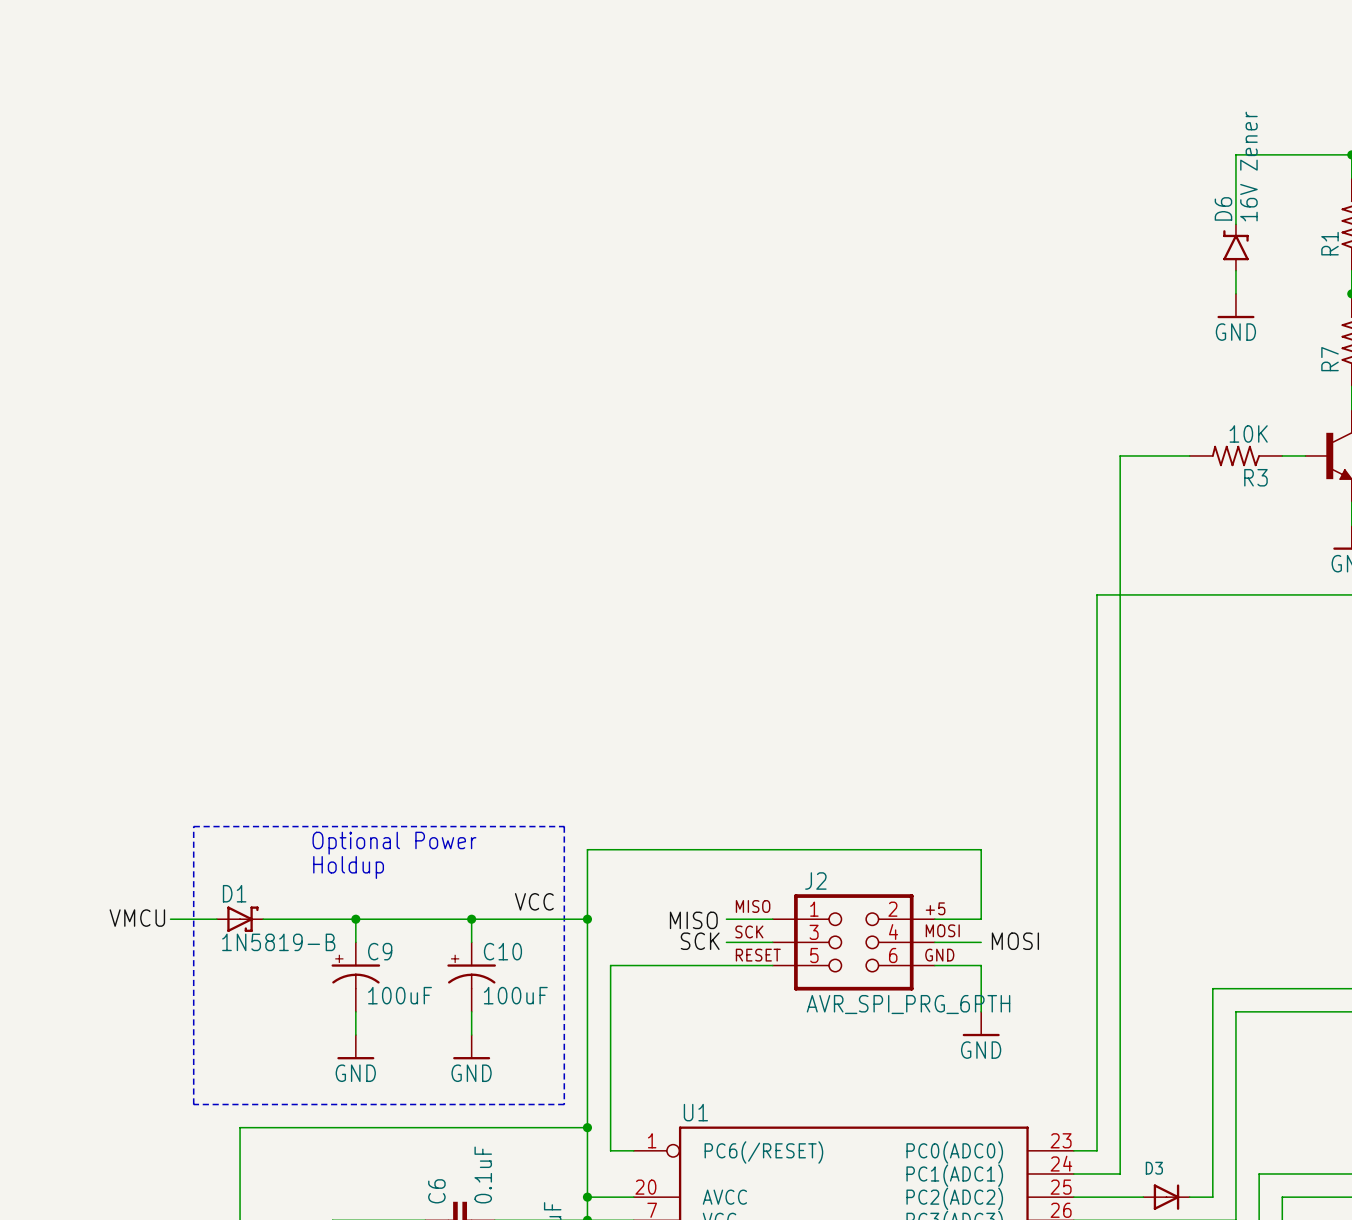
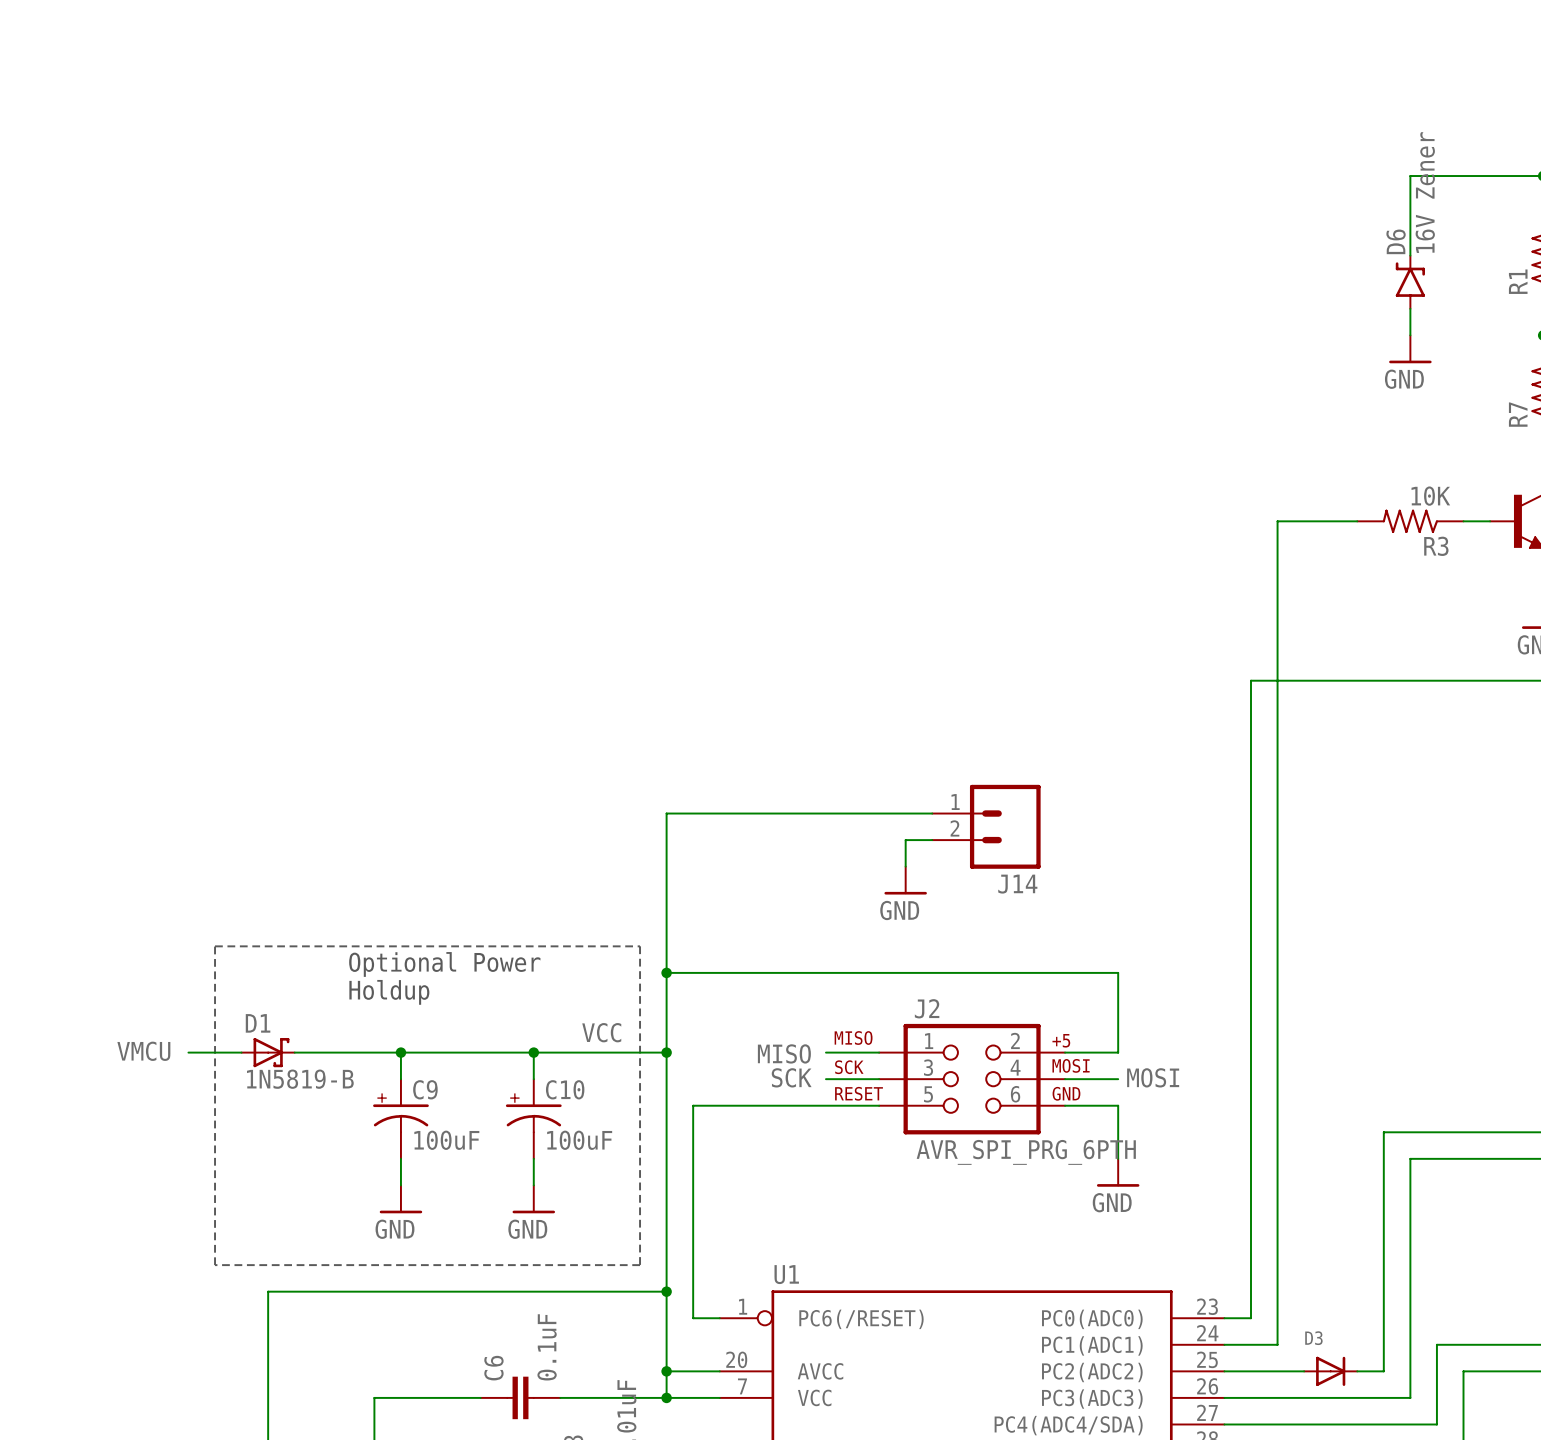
wire: none -> (932, 813) (666, 813) (666, 972)
J14: none -> (986, 826)
wire: none -> (932, 840) (905, 840) (905, 866)
power symbol: none -> GND (905, 880)
junction: none -> (666, 972)

